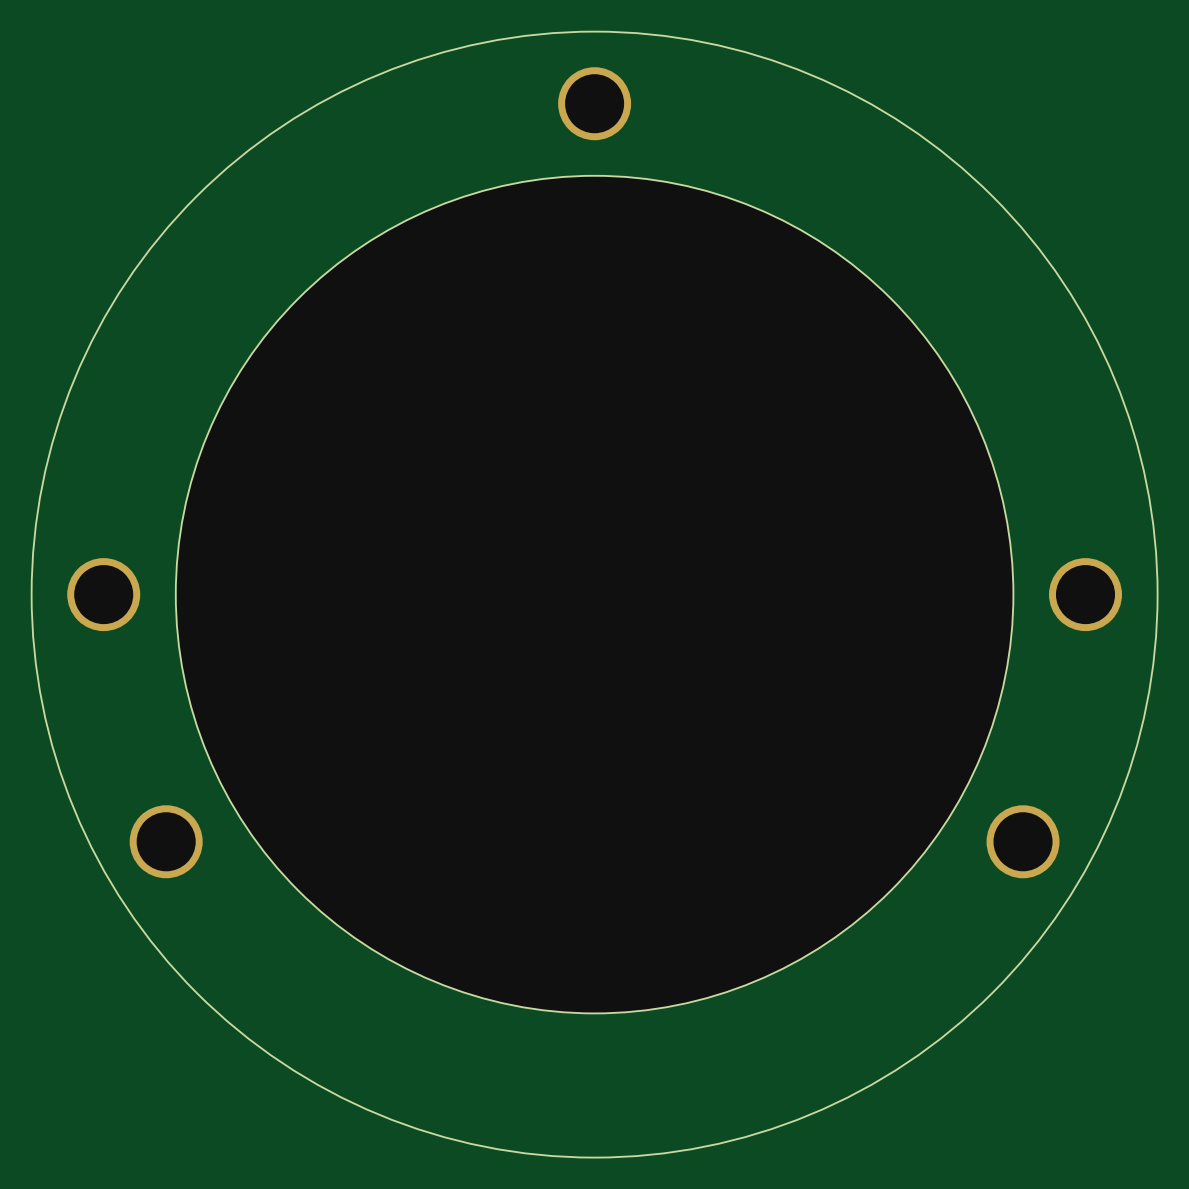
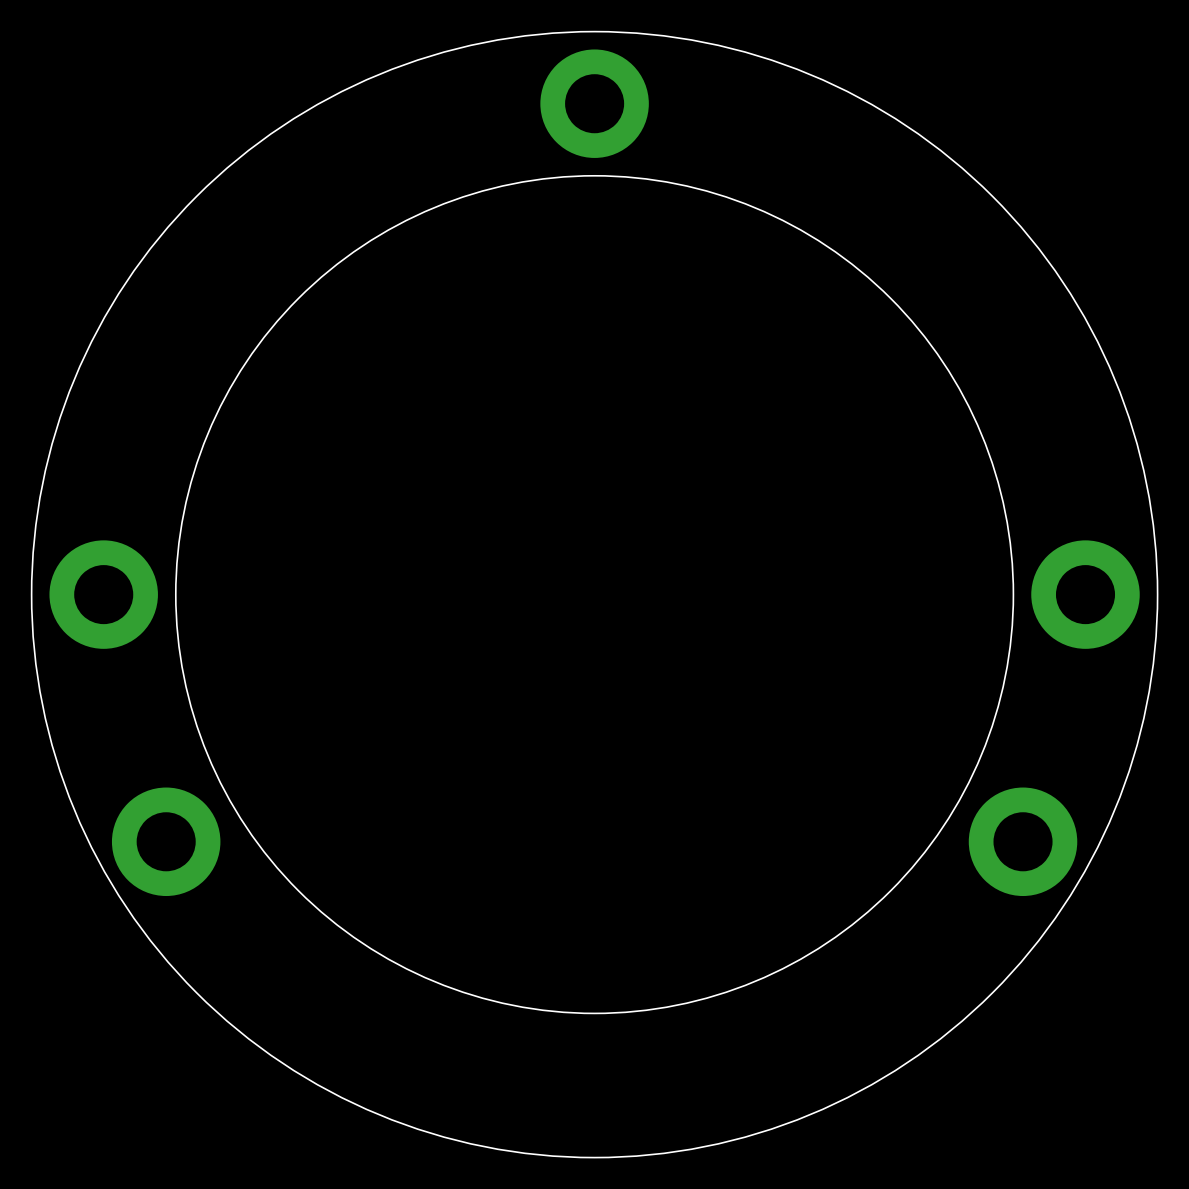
via size: [558, 67, 632, 141] -> [540, 49, 649, 158]
via size: [67, 558, 141, 632] -> [49, 540, 158, 649]
via size: [1049, 558, 1122, 632] -> [1031, 540, 1140, 649]
via size: [129, 805, 203, 879] -> [111, 787, 221, 897]
via size: [986, 805, 1060, 879] -> [968, 787, 1078, 897]

